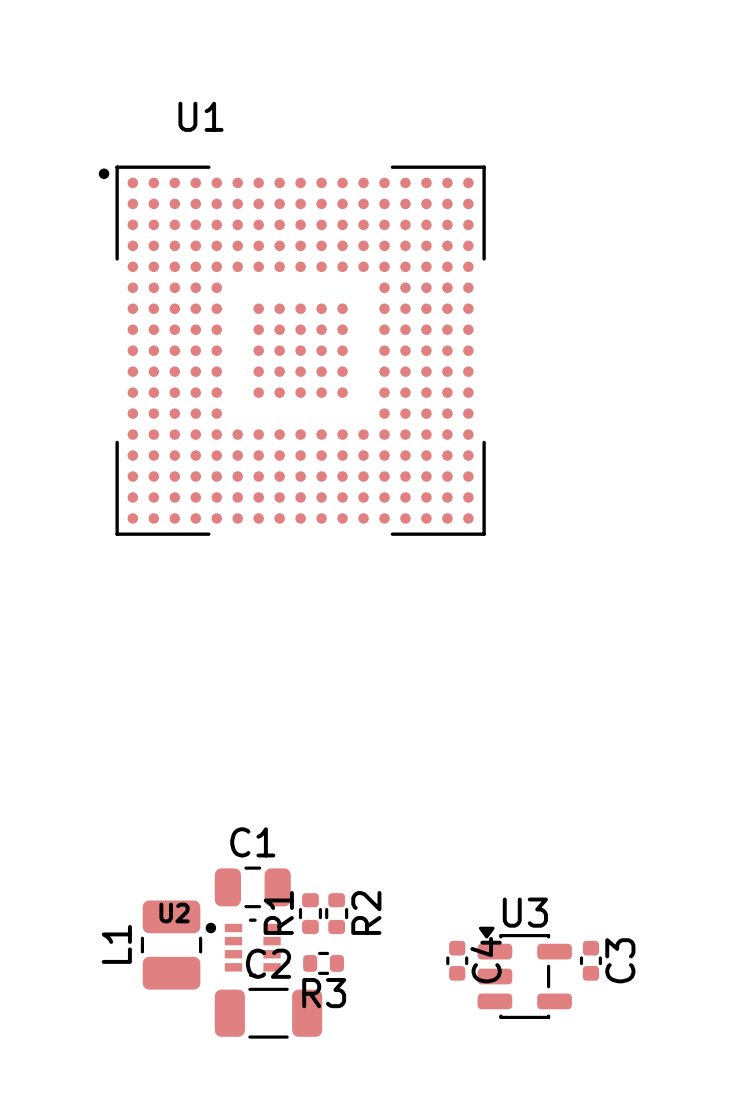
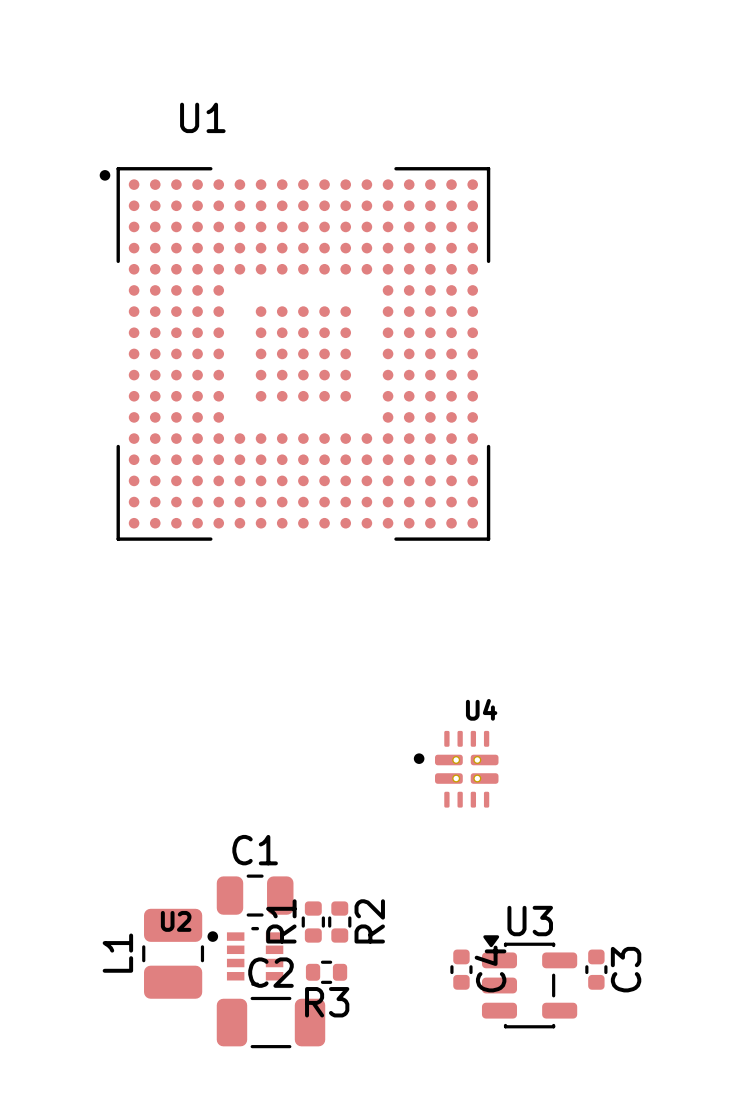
U4: none -> (456, 769)

